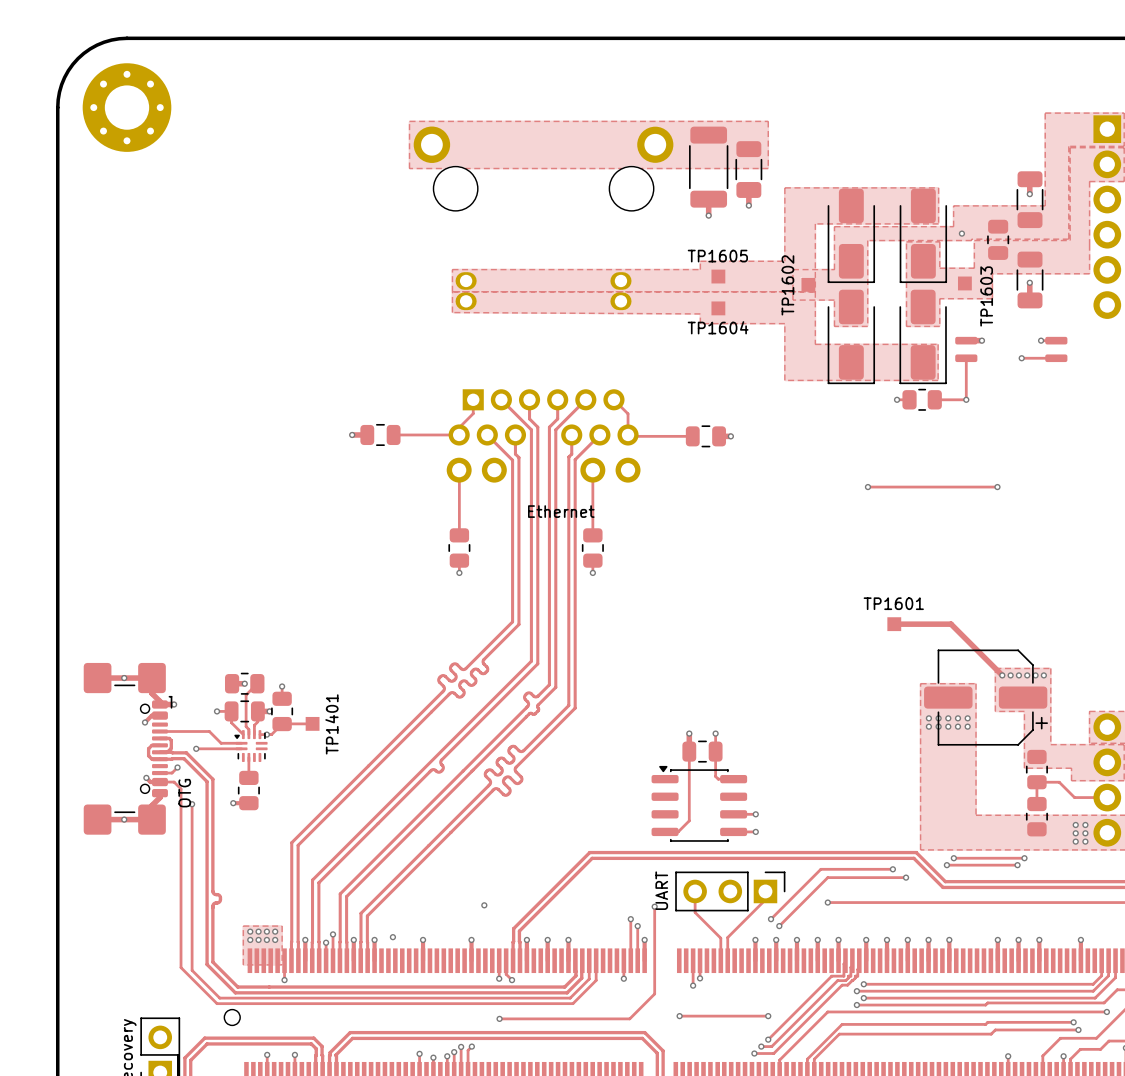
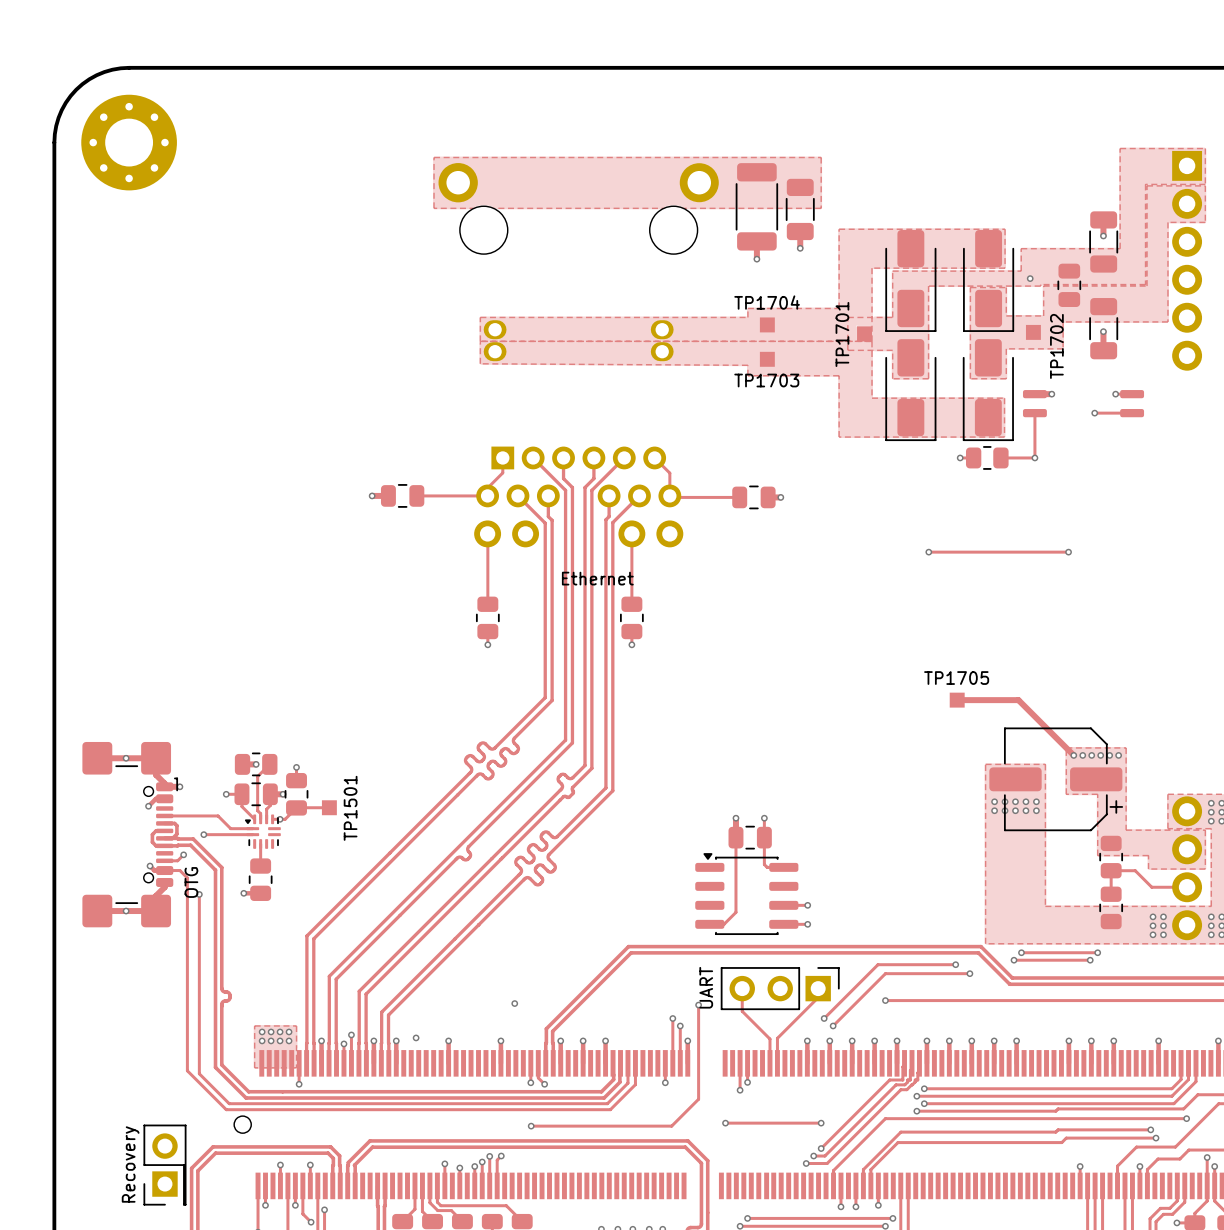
TP1605 name: TP1605 (717, 256) -> TP1704 (767, 302)
TP1602 name: TP1602 (787, 285) -> TP1701 (842, 334)
TP1603 name: TP1603 (986, 296) -> TP1702 (1056, 346)
TP1604 name: TP1604 (718, 327) -> TP1703 (766, 380)
TP1601 name: TP1601 (893, 603) -> TP1705 (956, 678)
TP1401 name: TP1401 (331, 724) -> TP1501 (350, 808)

